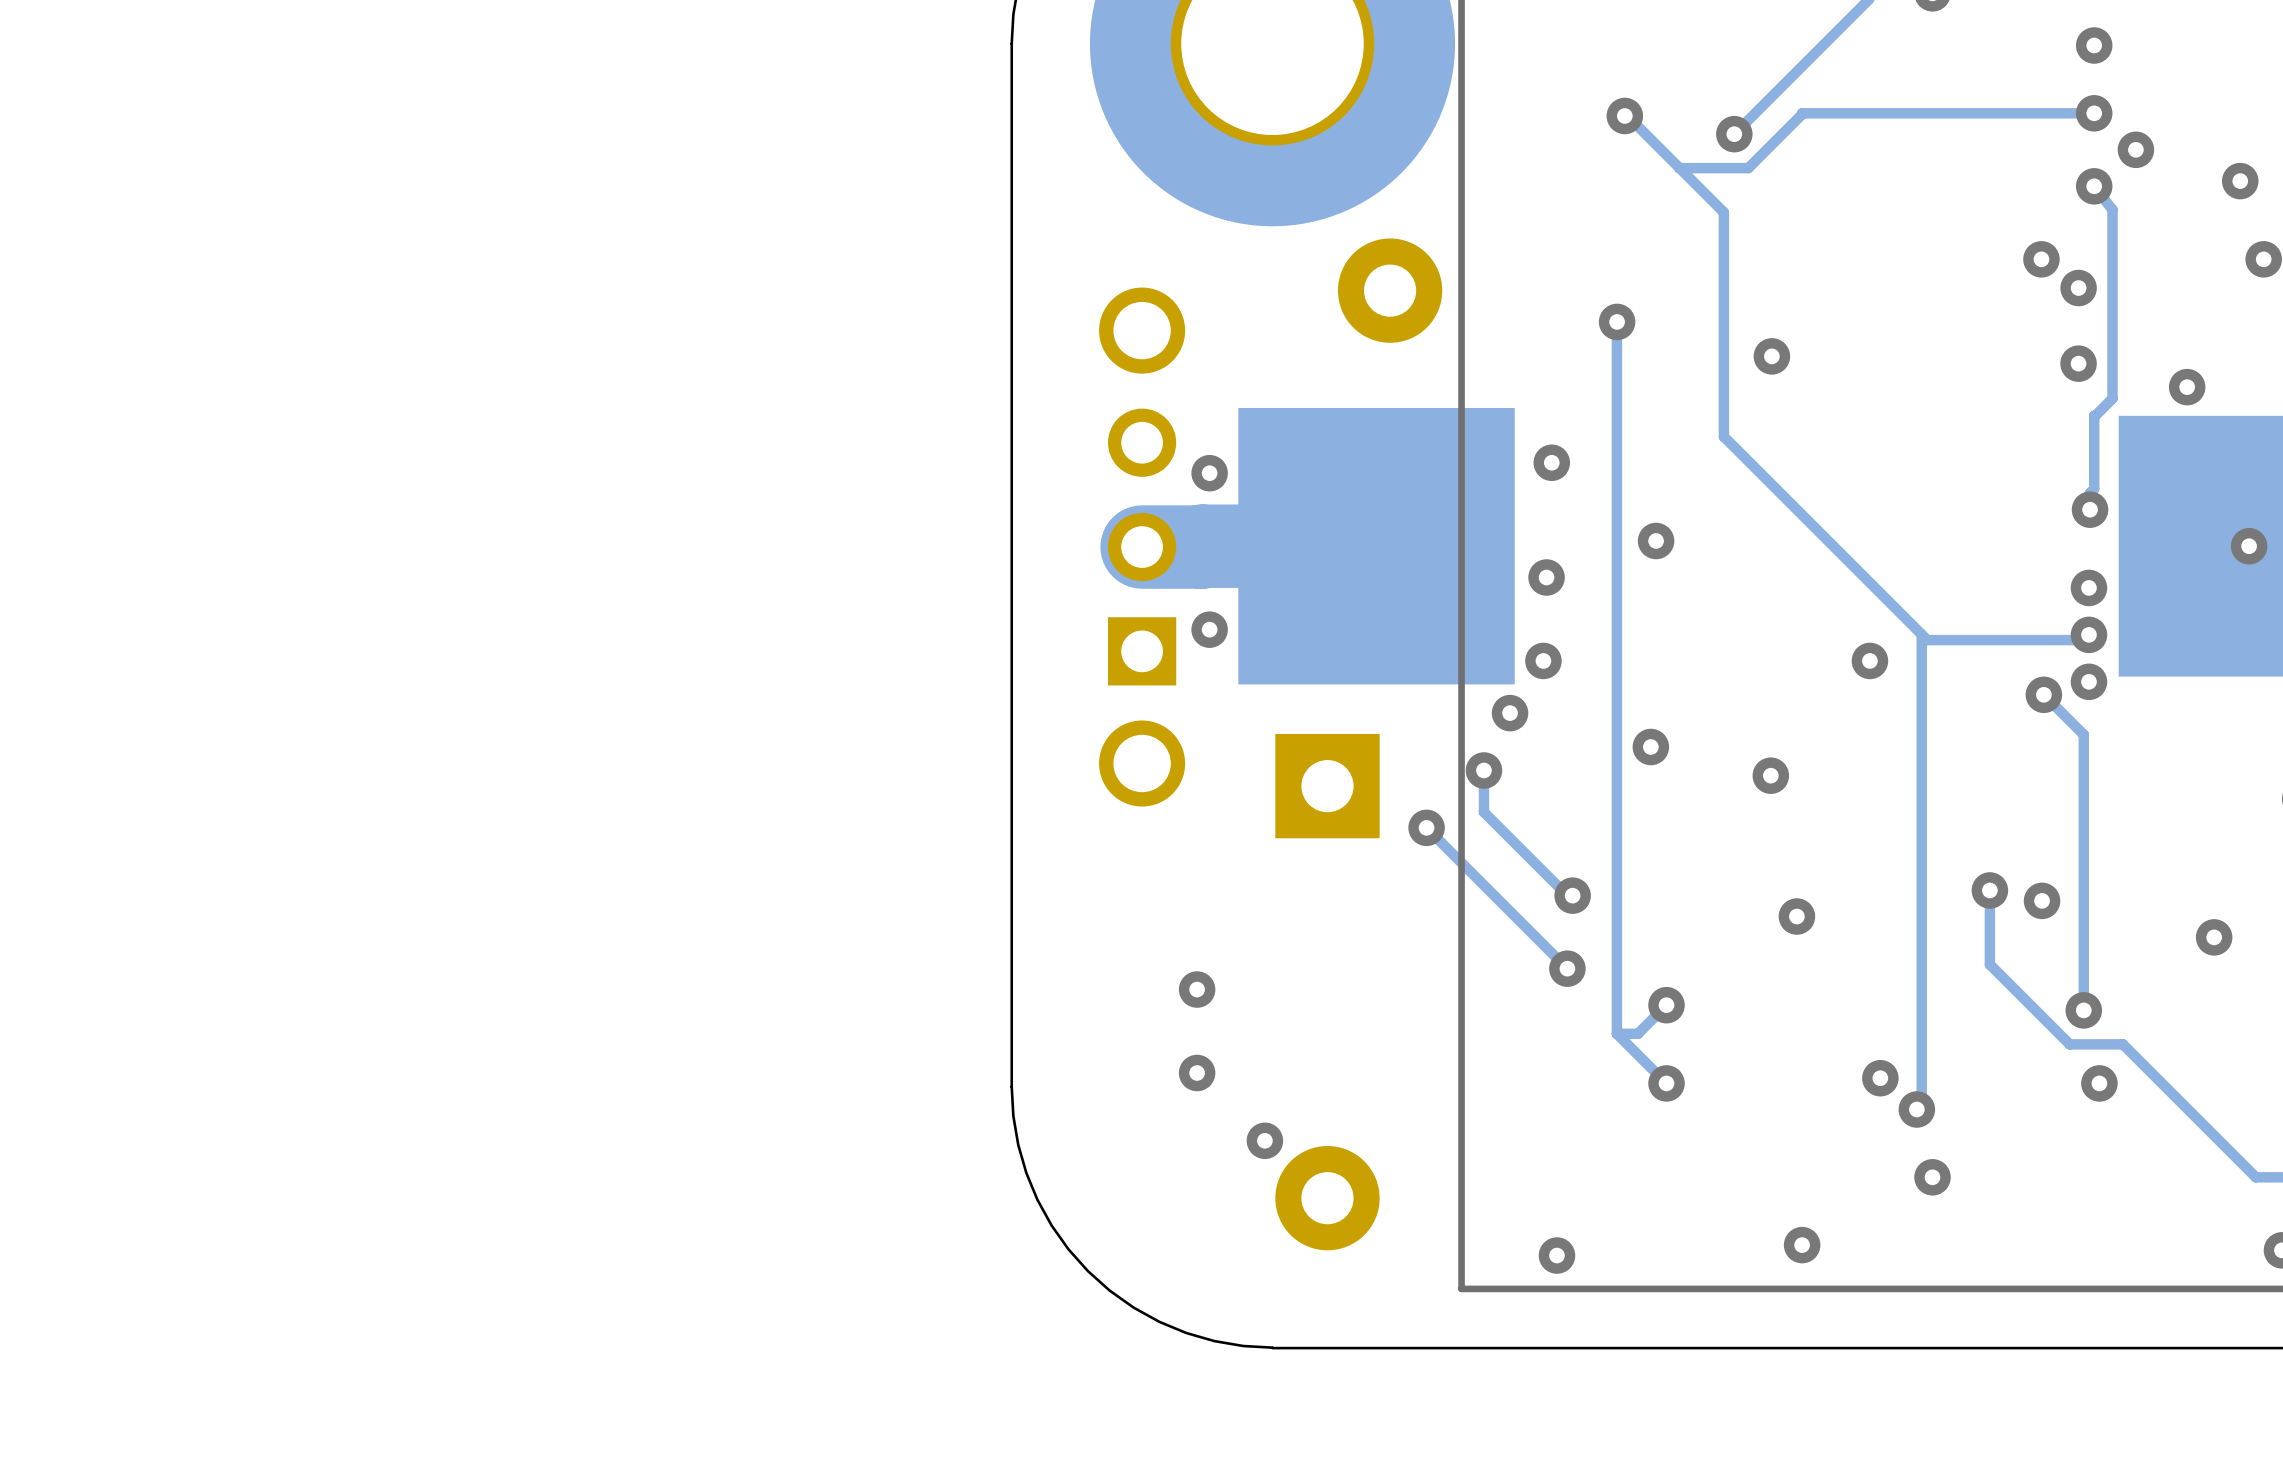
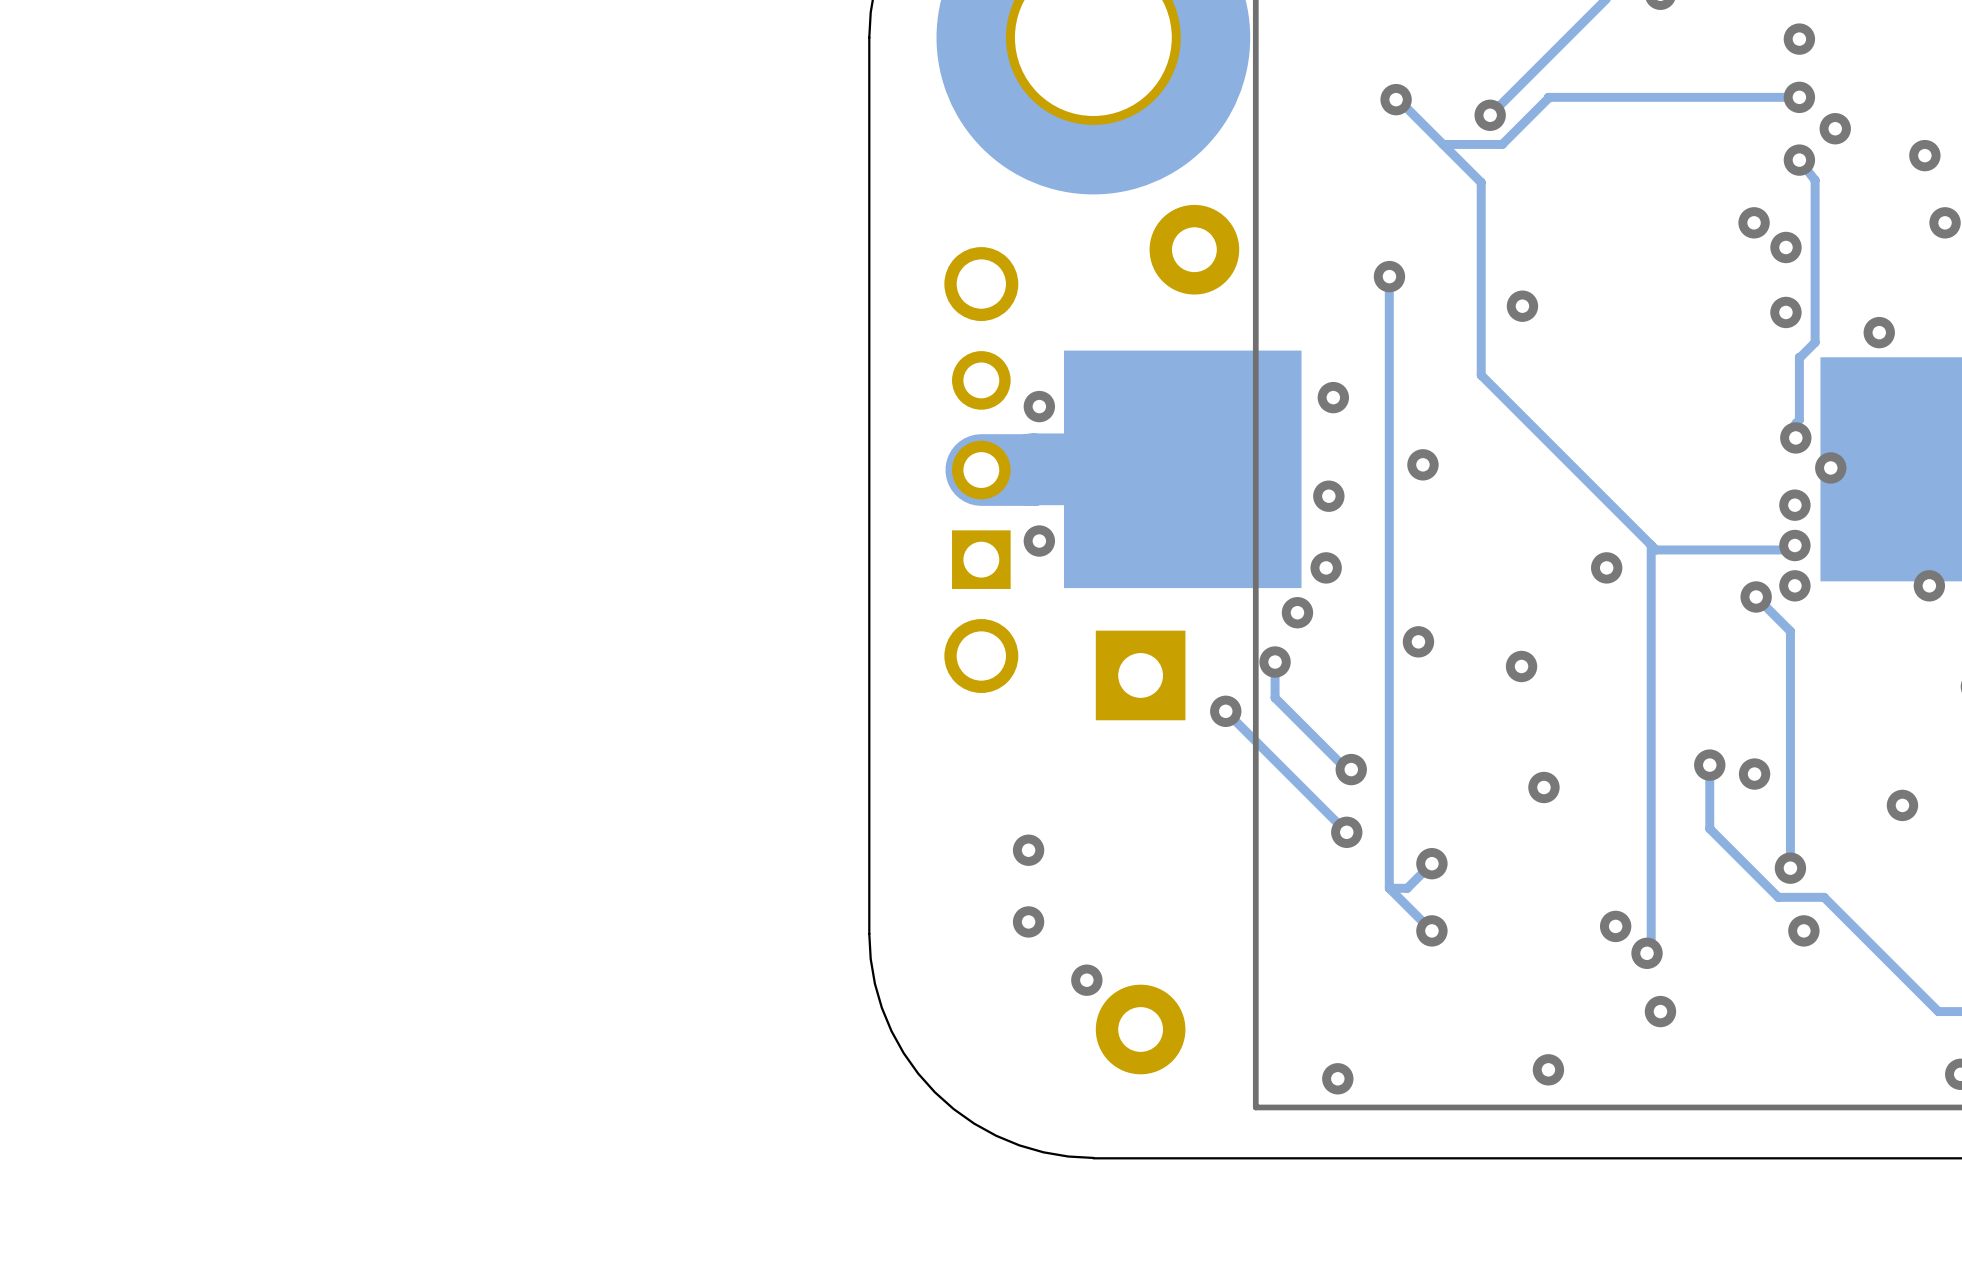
via: none -> (1830, 467)
via: (2249, 546) -> none
via: none -> (1929, 585)

